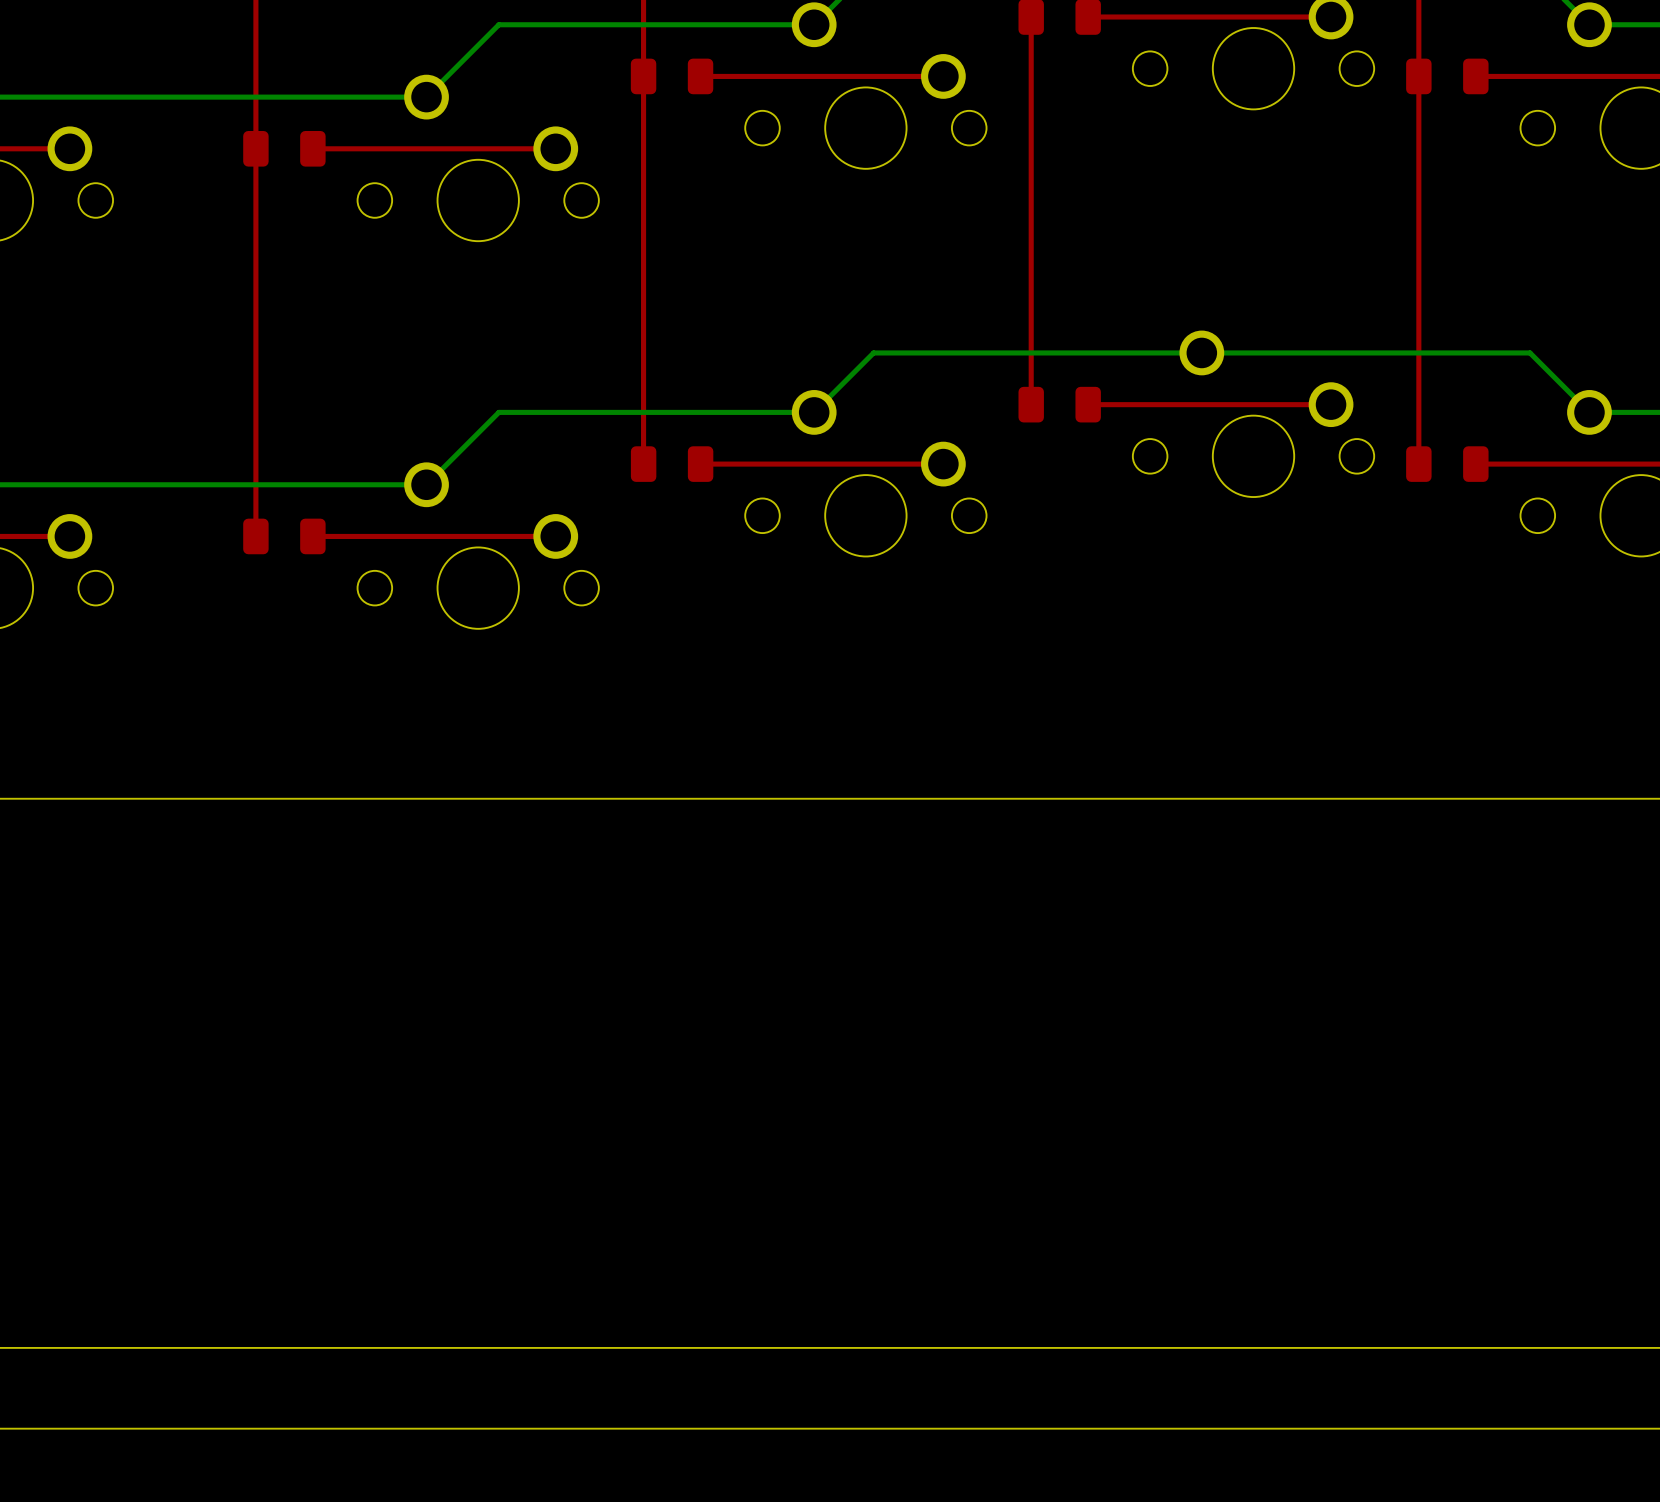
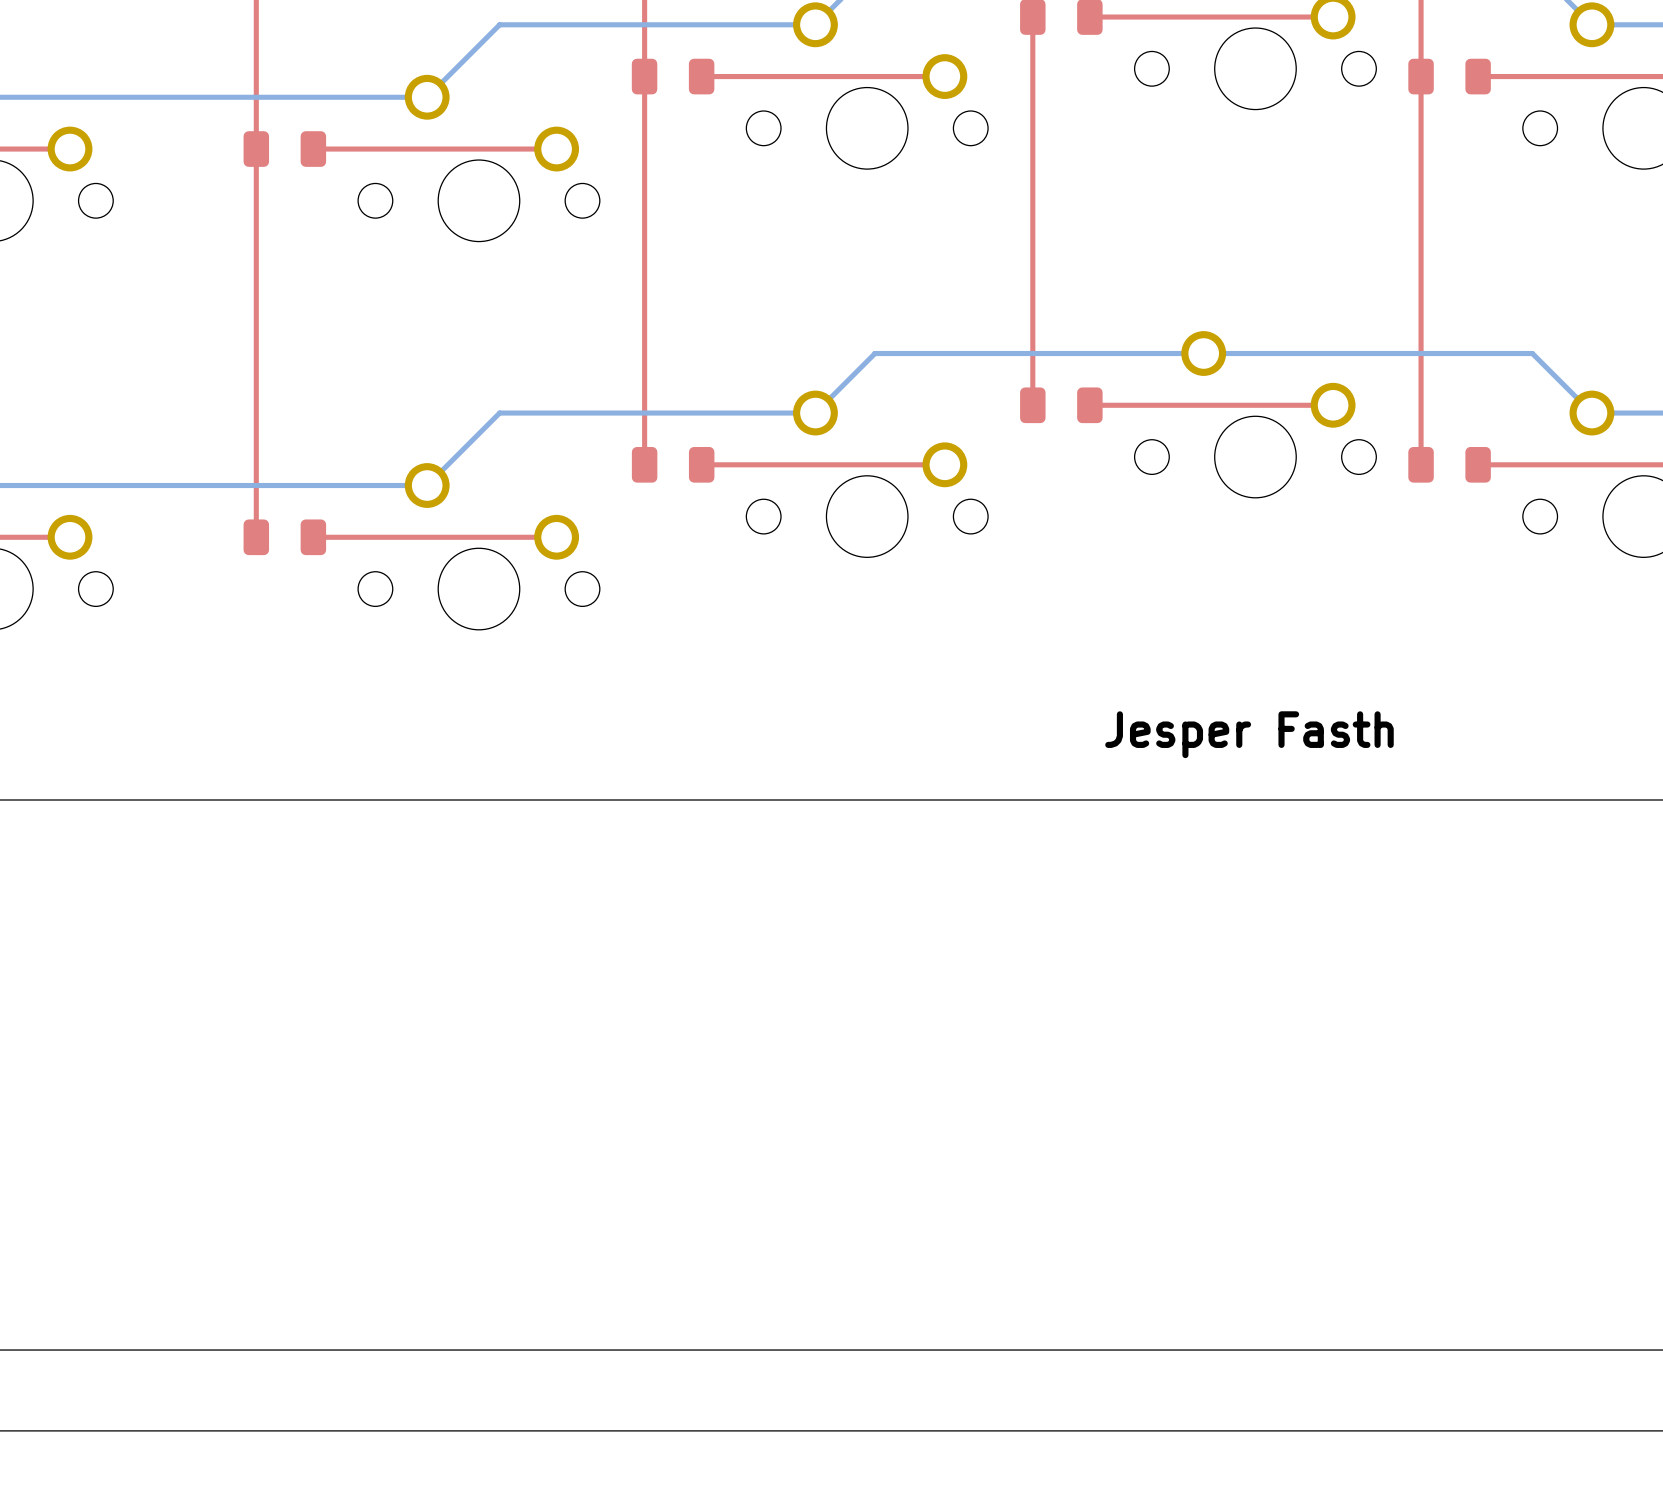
text: none -> Jesper Fasth (1249, 734)

